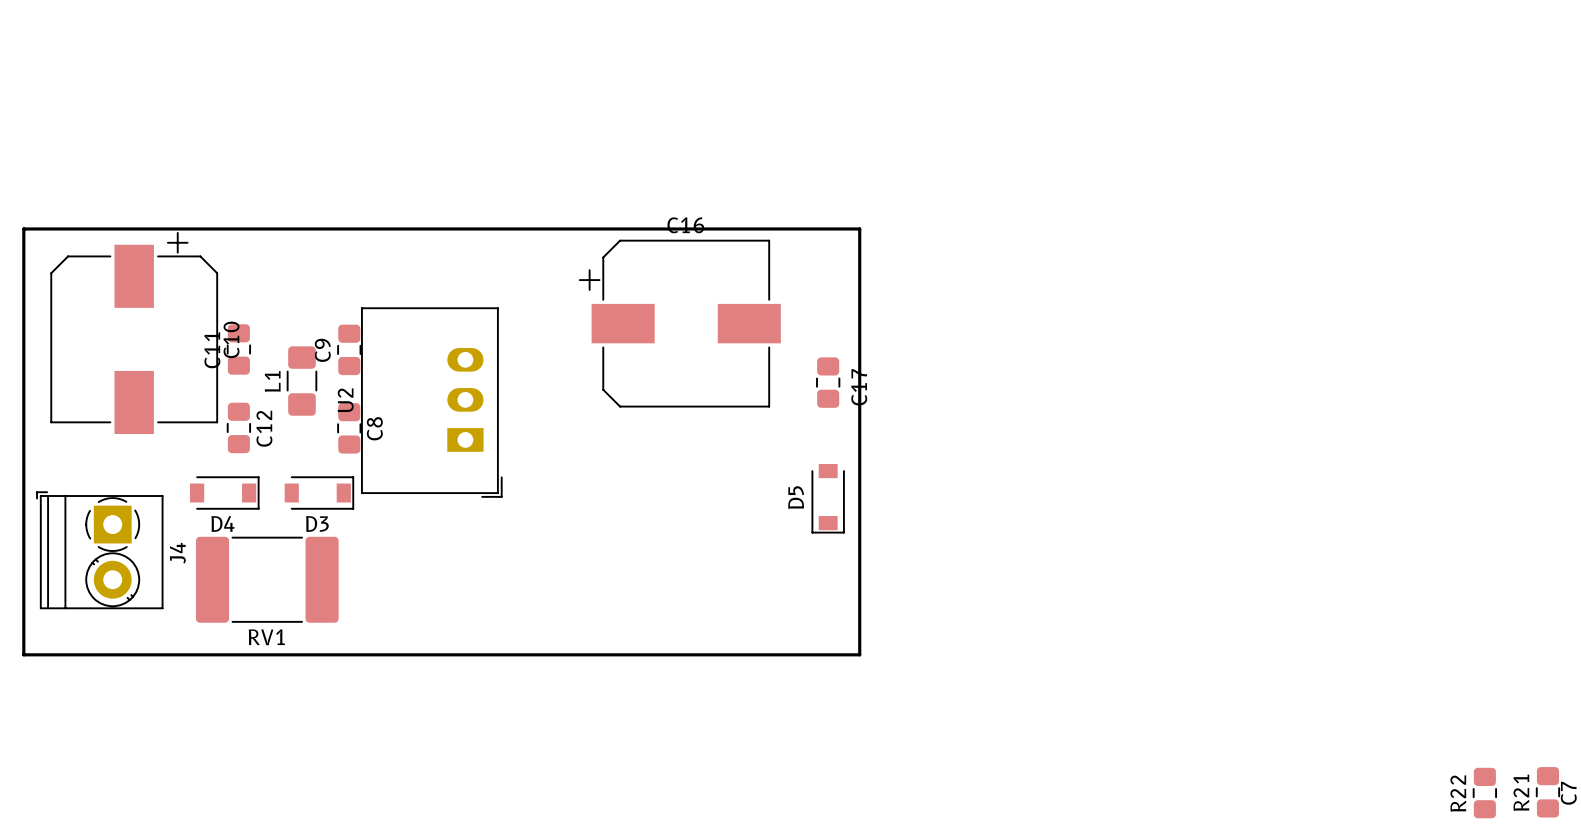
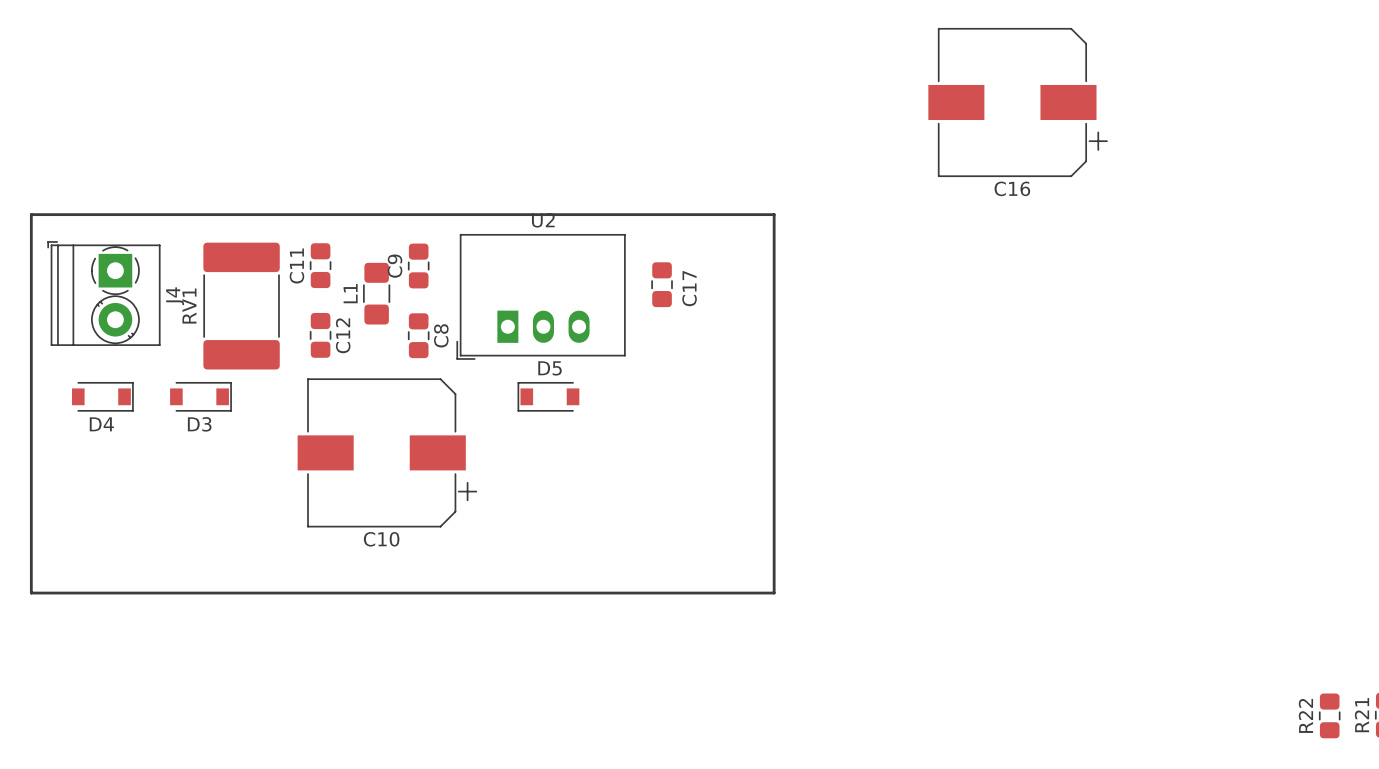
C16 rotation: 0° (679, 323) -> 180° (1018, 102)
C16 position: (679, 323) -> (1018, 102)
C10 rotation: 0° (134, 333) -> 90° clockwise (387, 452)
C10 position: (134, 333) -> (387, 452)
C11 position: (238, 349) -> (320, 265)
C9 position: (349, 349) -> (418, 265)
L1 position: (301, 381) -> (376, 293)
C17 position: (828, 382) -> (662, 284)
U2 rotation: 0° (431, 402) -> 90° clockwise (541, 296)
U2 position: (431, 402) -> (541, 296)
C12 position: (238, 427) -> (320, 335)
C8 position: (349, 428) -> (418, 335)
D4 position: (224, 493) -> (102, 396)
D3 position: (319, 493) -> (200, 396)
D5 rotation: 0° (828, 498) -> 90° clockwise (548, 396)
D5 position: (828, 498) -> (548, 396)
J4 position: (99, 550) -> (103, 293)
RV1 rotation: 0° (267, 579) -> 90° clockwise (241, 306)
RV1 position: (267, 579) -> (241, 306)

